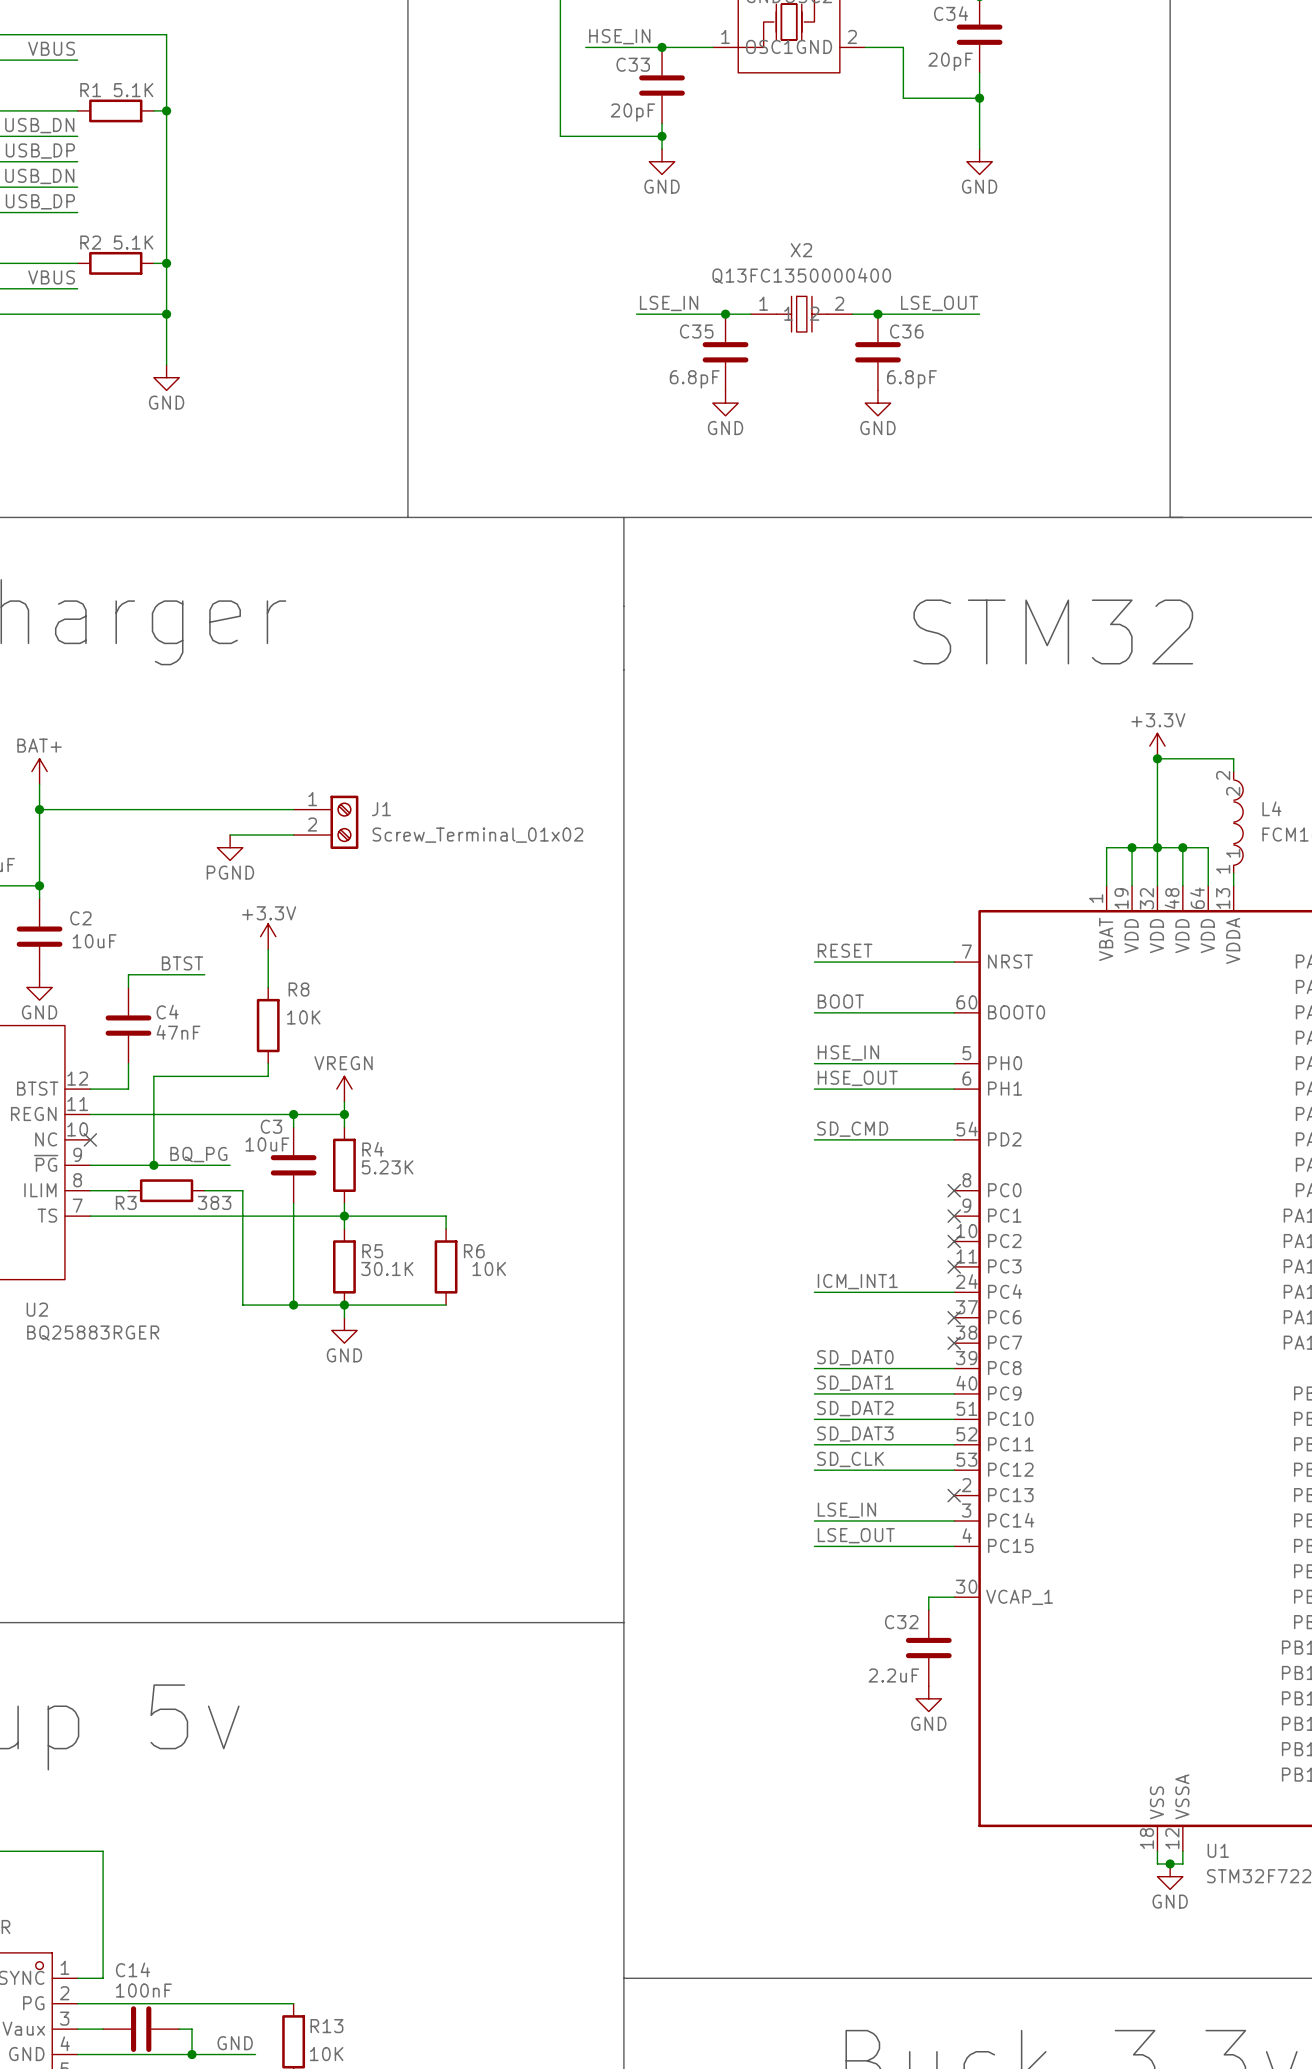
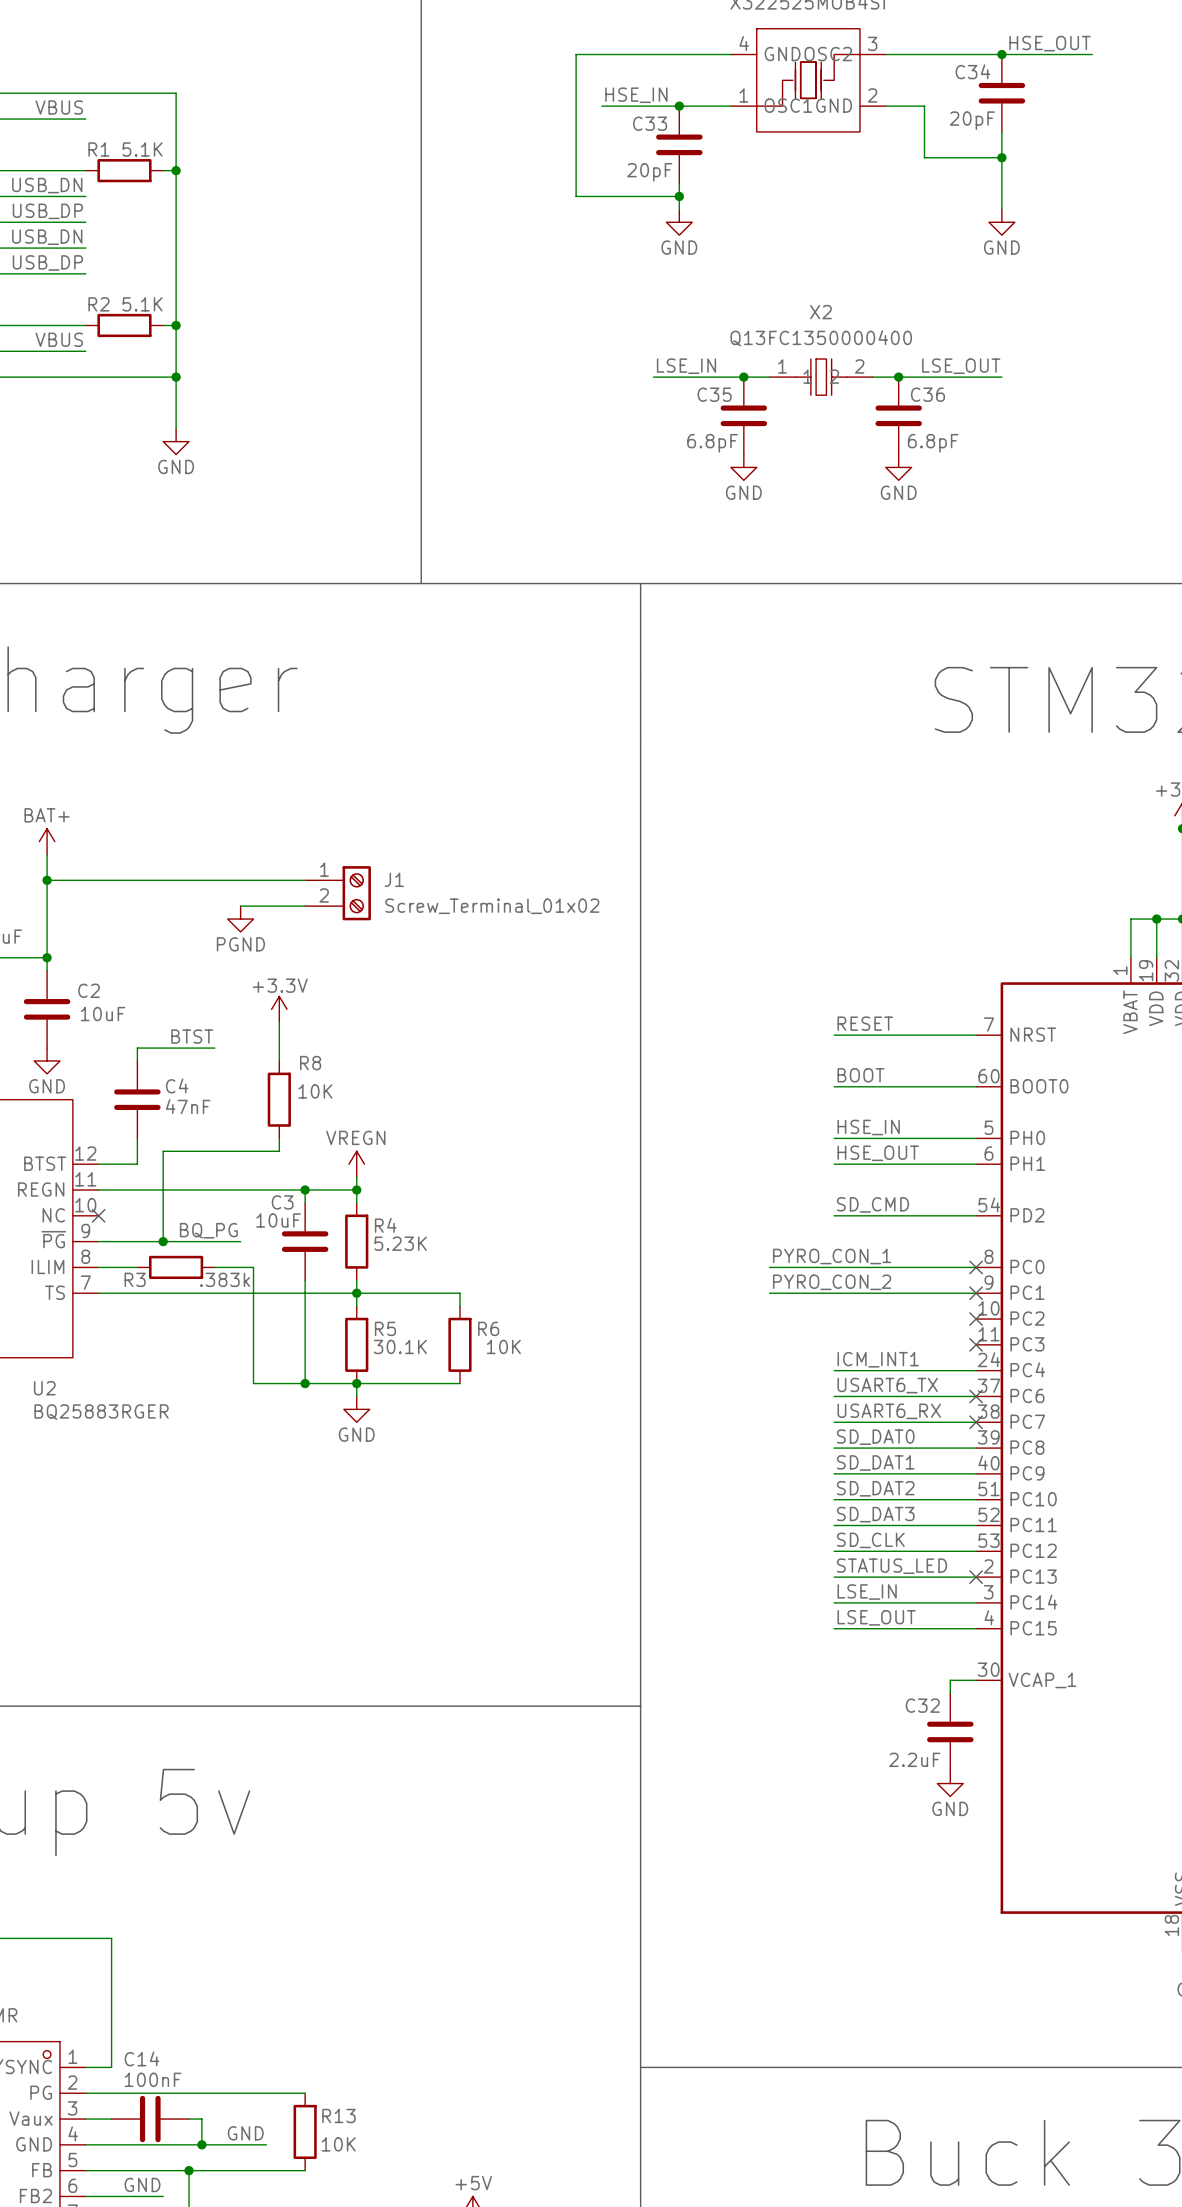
label: none -> PYRO_CON_1 (832, 1256)
wire: none -> (769, 1267) (976, 1267)
R3 value: 383 (214, 1202) -> .383k (225, 1279)
label: none -> PYRO_CON_2 (832, 1282)
wire: none -> (769, 1293) (976, 1293)
label: none -> USART6_TX (887, 1385)
wire: none -> (834, 1396) (976, 1396)
label: none -> USART6_RX (889, 1411)
wire: none -> (834, 1422) (976, 1422)
label: none -> STATUS_LED (892, 1566)
wire: none -> (834, 1577) (976, 1577)

